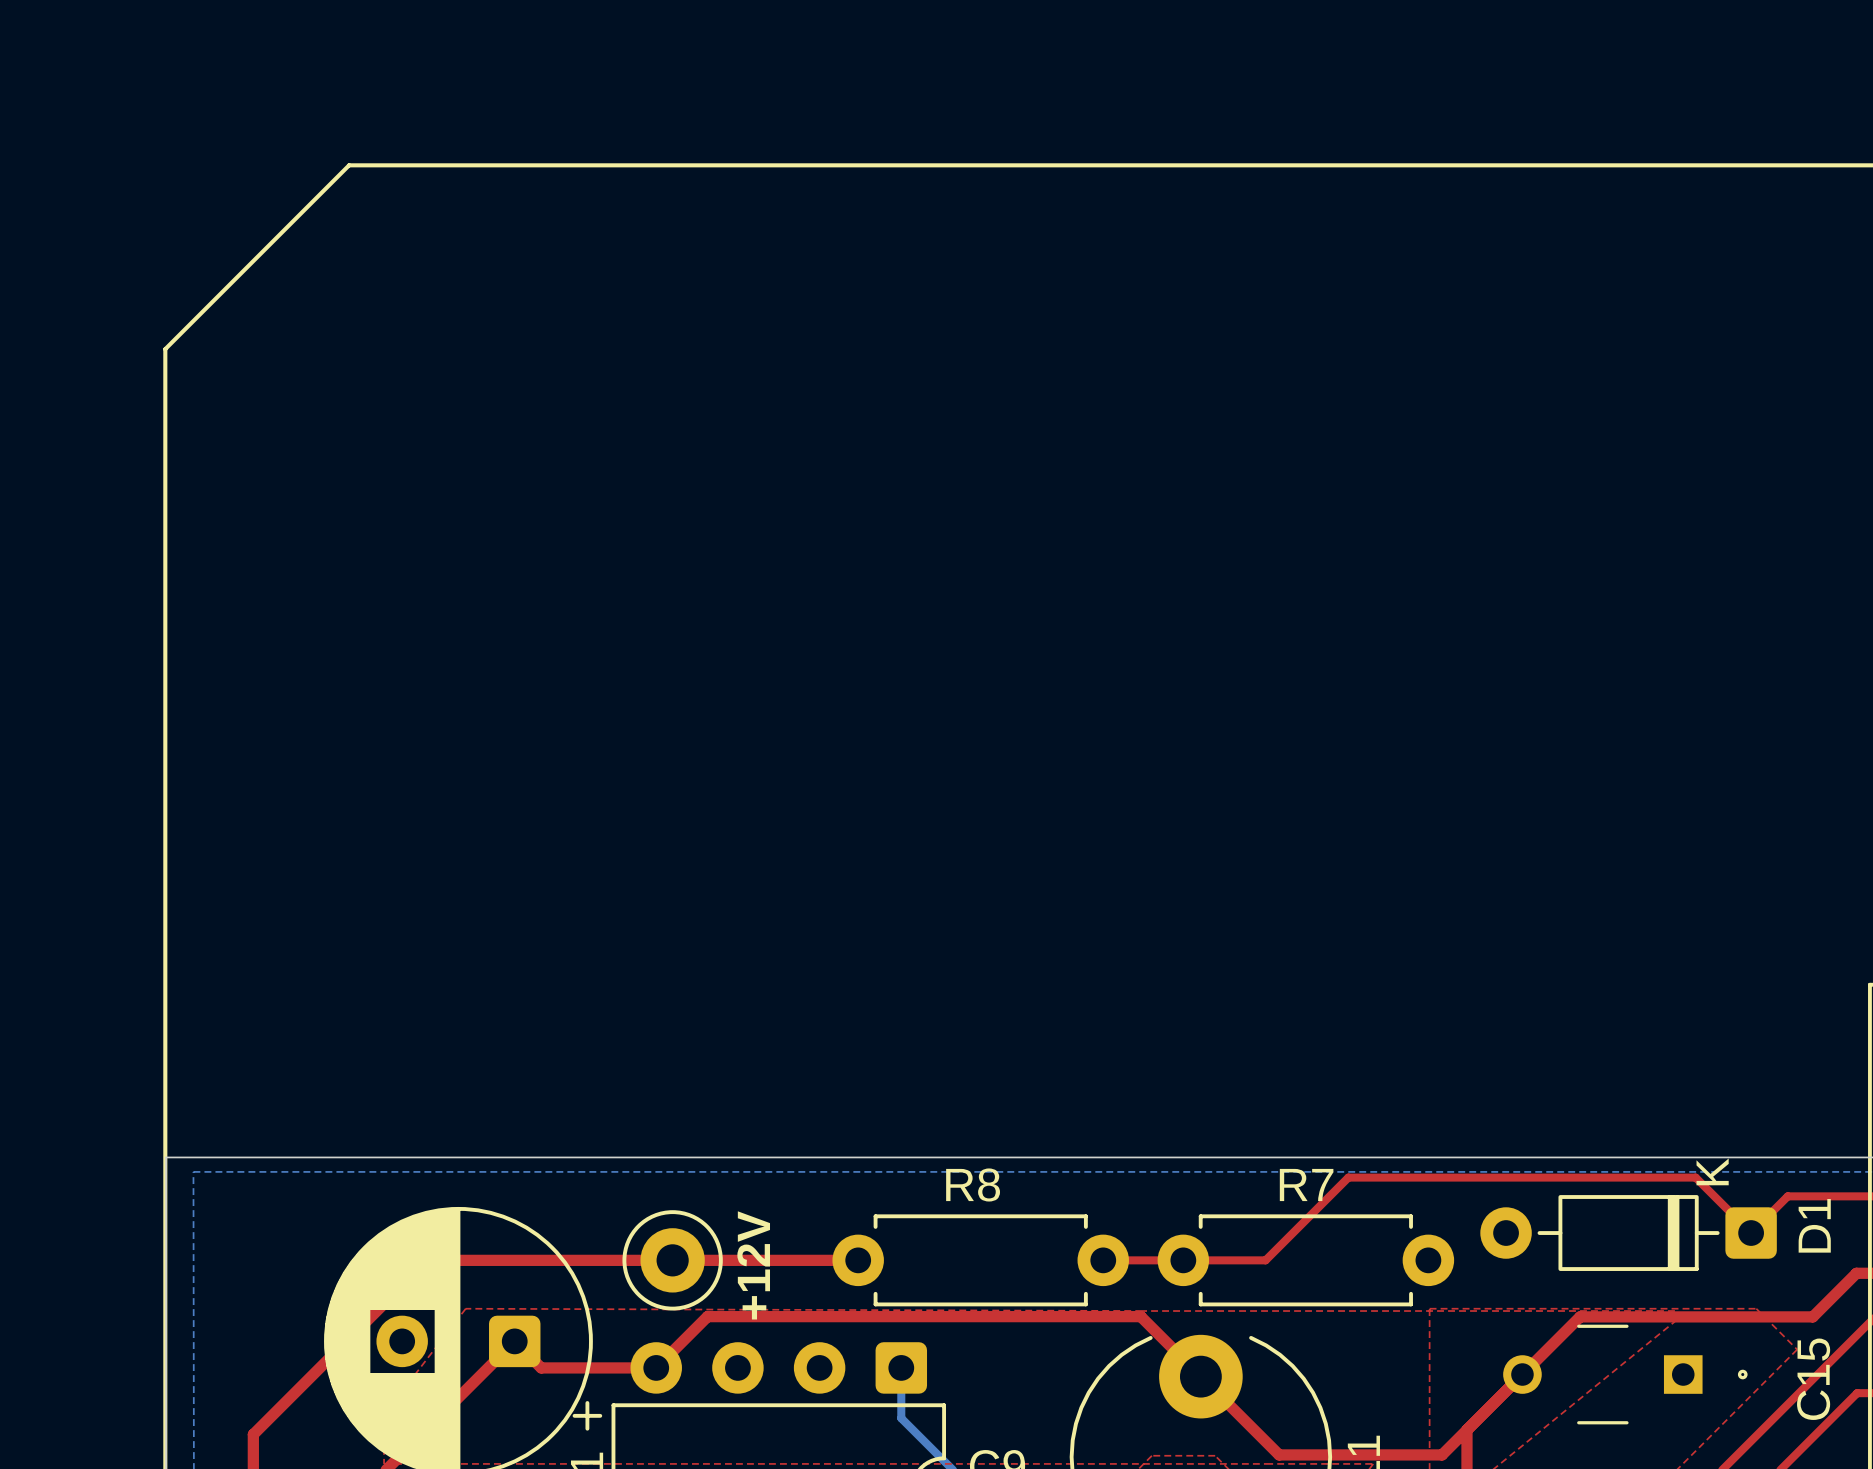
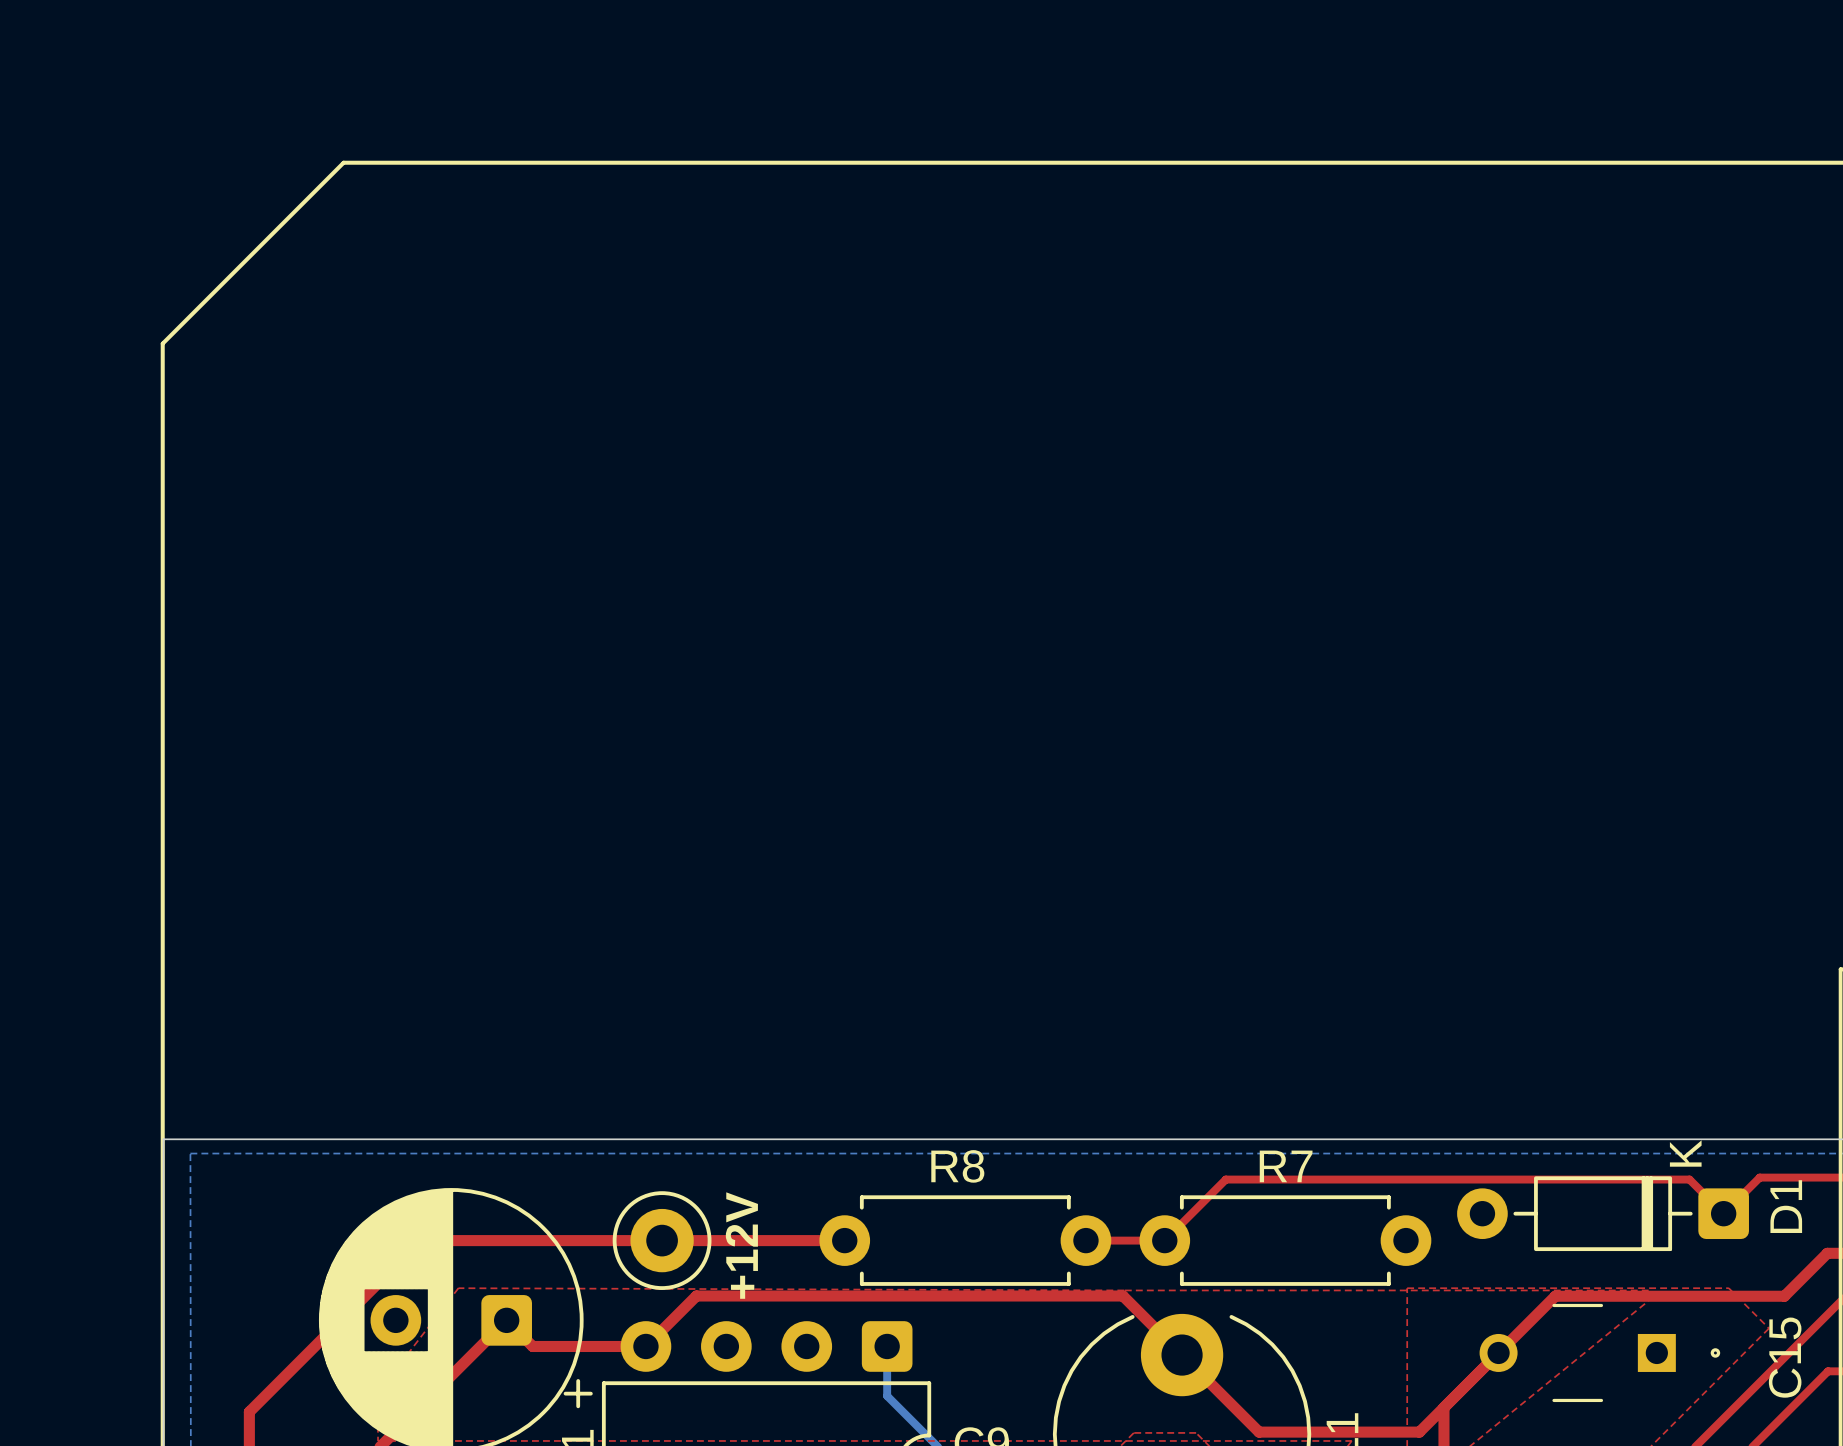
top track: (1716, 1198) (1695, 1177) (1348, 1177) (1265, 1260) (1183, 1260) -> (1689, 1179) (1225, 1179) (1164, 1240)

